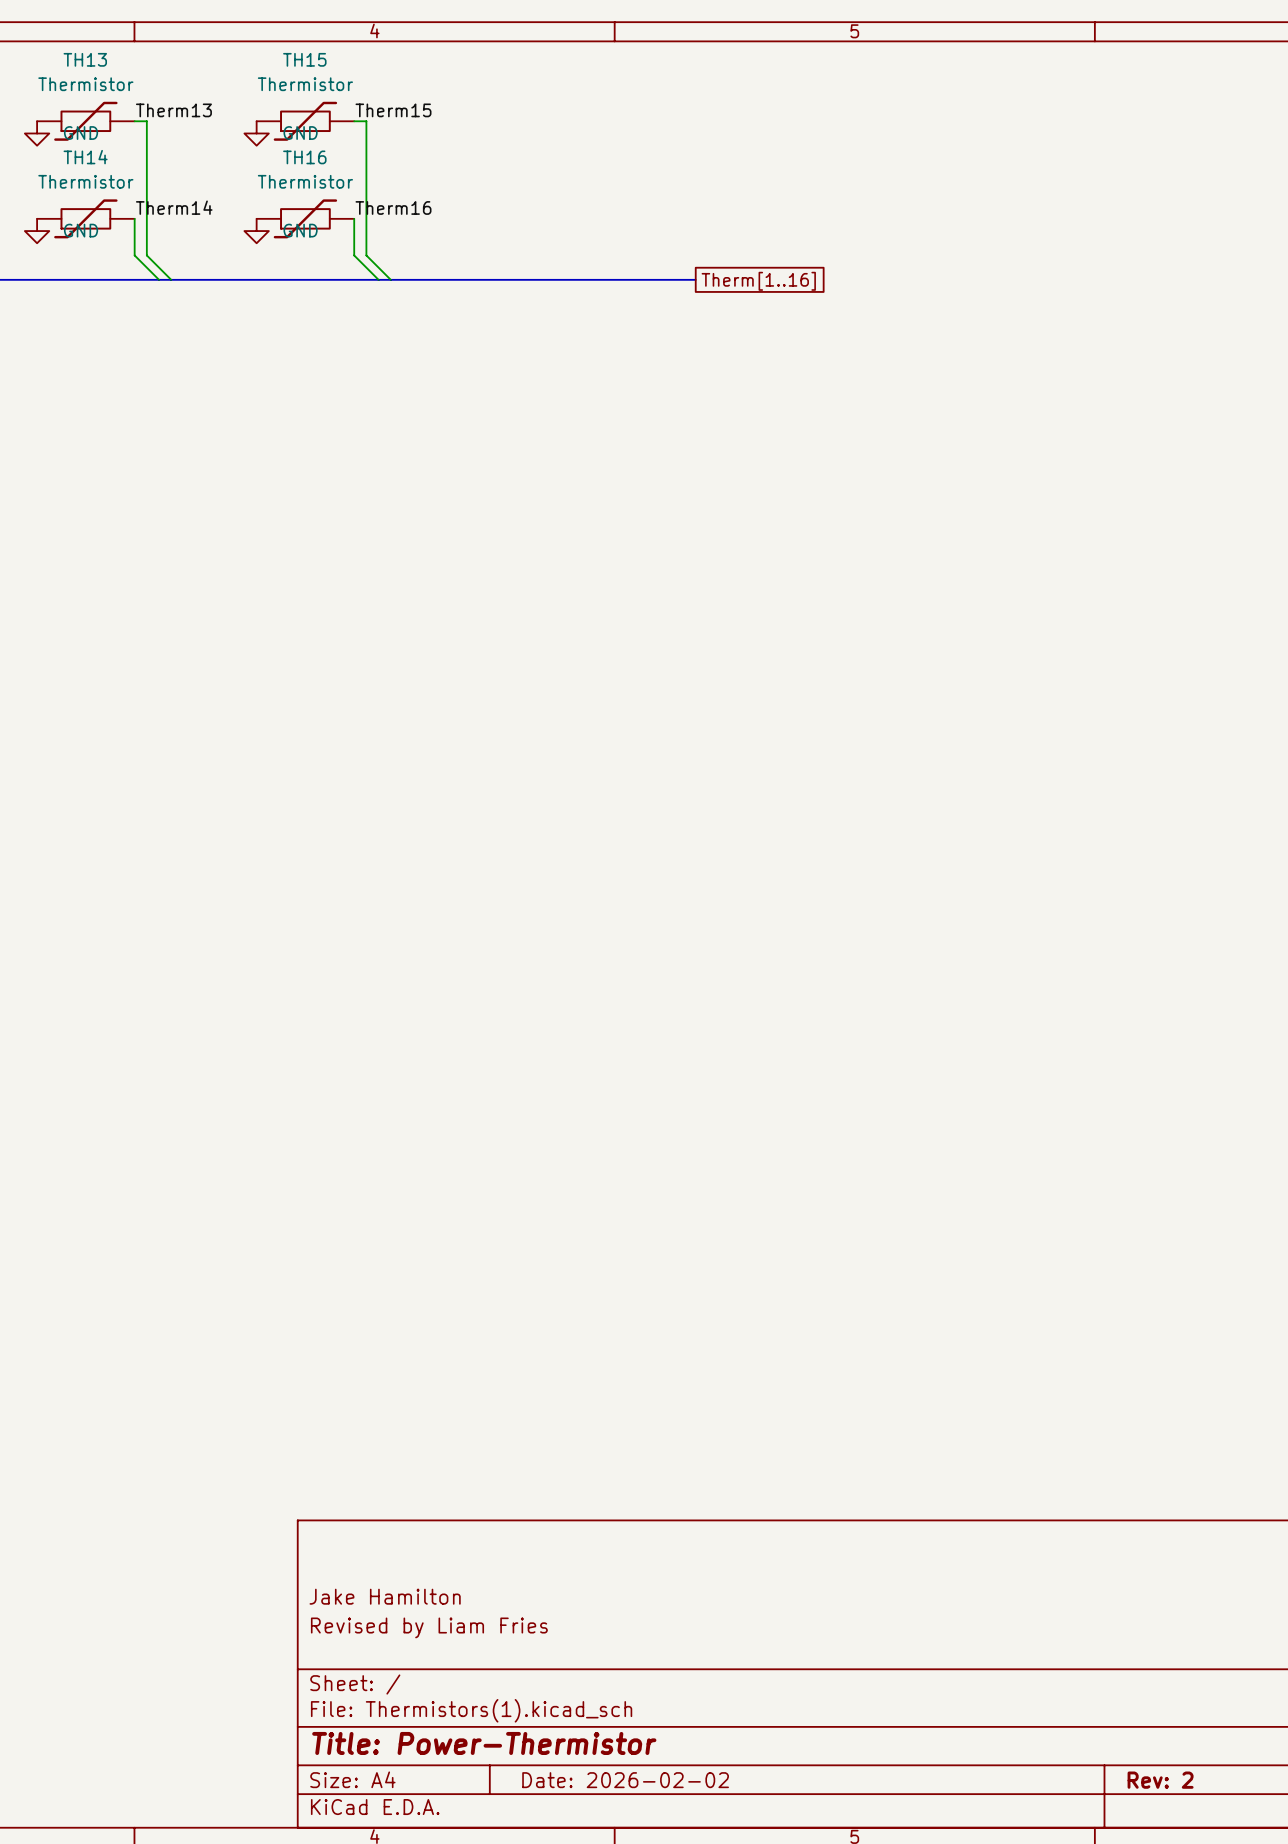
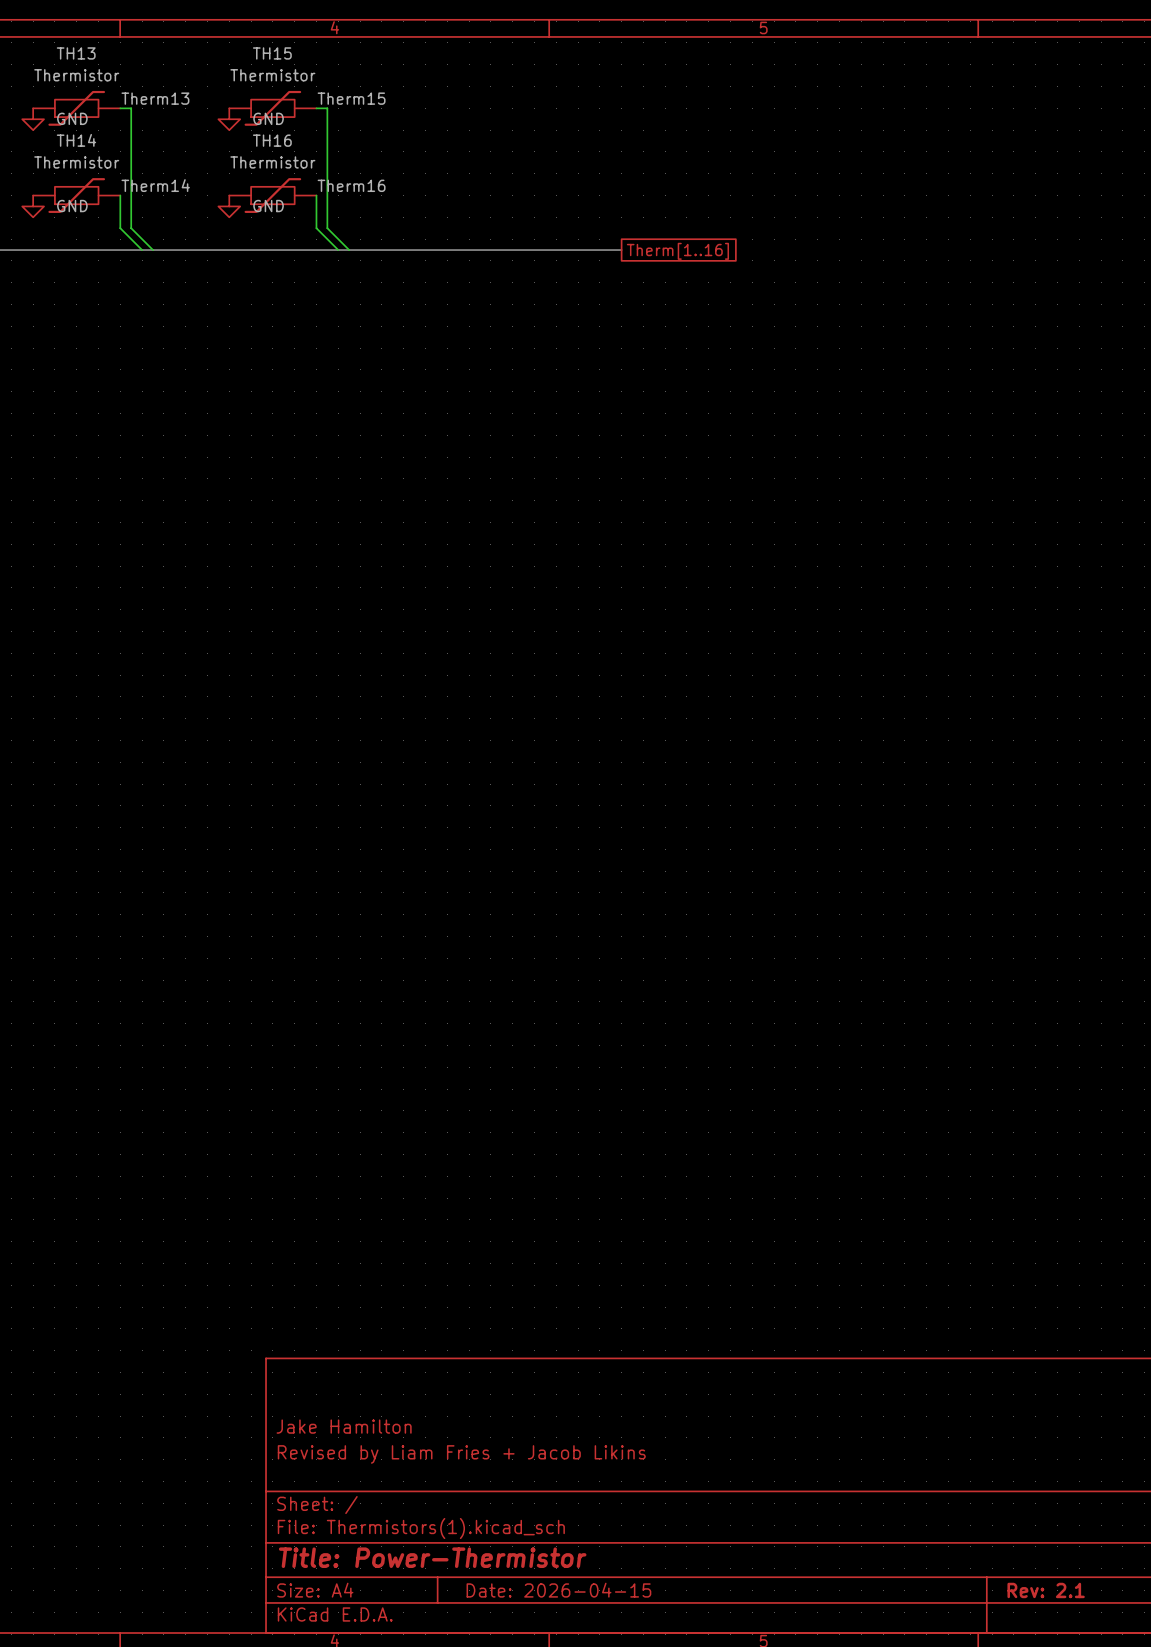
title block: Revised by Liam Fries (429, 1627) -> Revised by Liam Fries + Jacob Likins (461, 1454)
title block: Date: 2026-02-02 (625, 1780) -> Date: 2026-04-15 (558, 1590)
title block: Rev: 2 (1160, 1780) -> Rev: 2.1 (1046, 1590)

